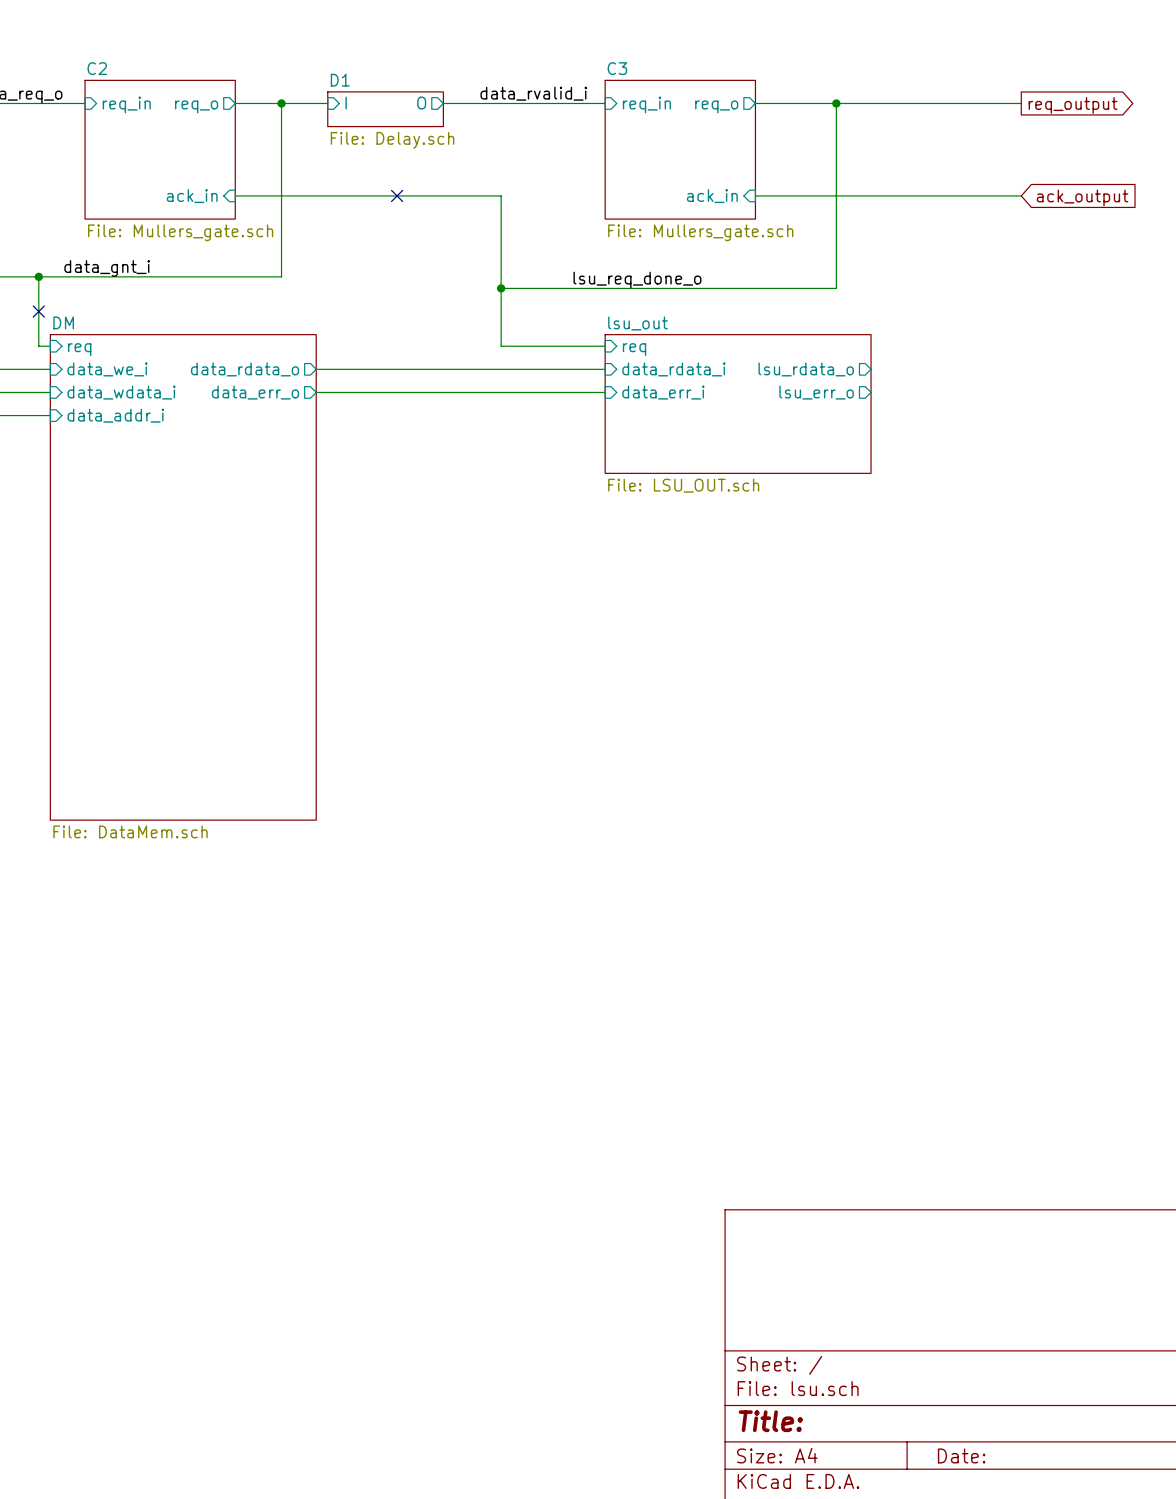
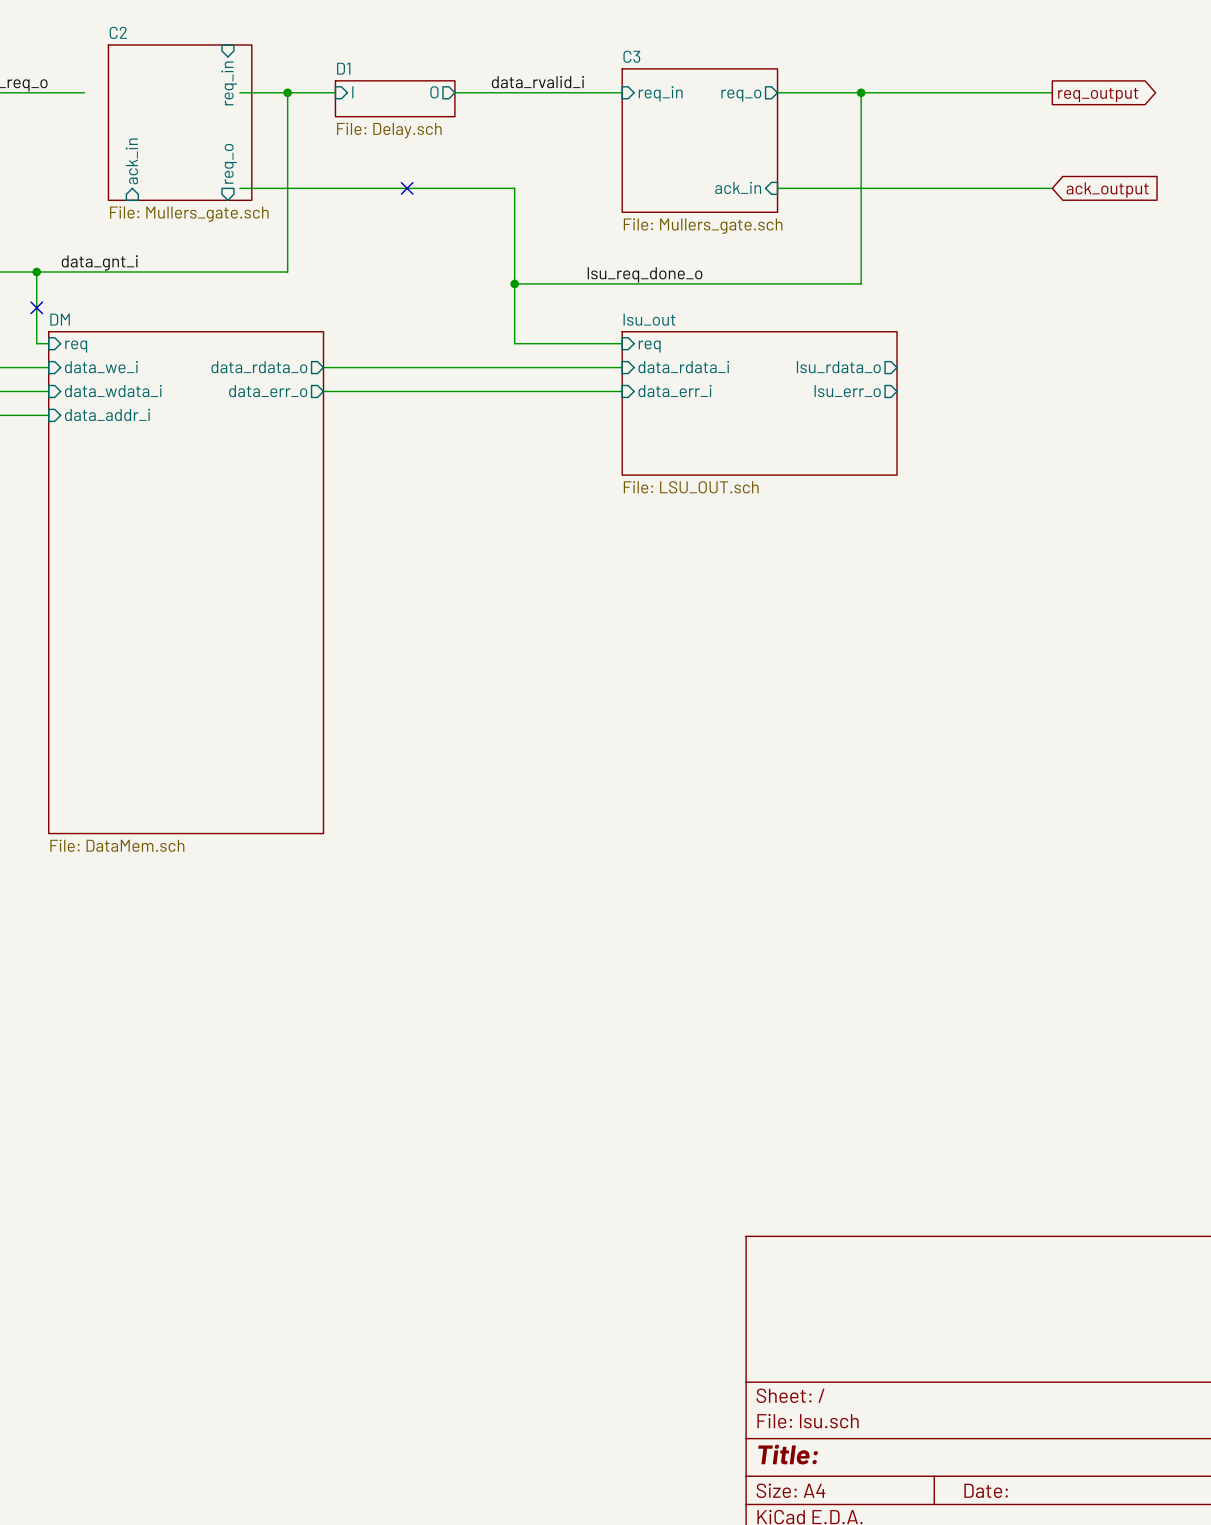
sheet pin rotation: 0° (126, 104) -> 90° clockwise (229, 83)
sheet pin position: req_in (126, 104) -> req_in (229, 83)
sheet pin: req_o (196, 106) -> none
sheet C2 rotation: 0° (160, 149) -> 90° clockwise (180, 122)
sheet pin: none -> ack_in (131, 161)
sheet pin shape: input (192, 196) -> output (230, 163)
sheet pin: ack_in (192, 196) -> req_o (230, 163)

